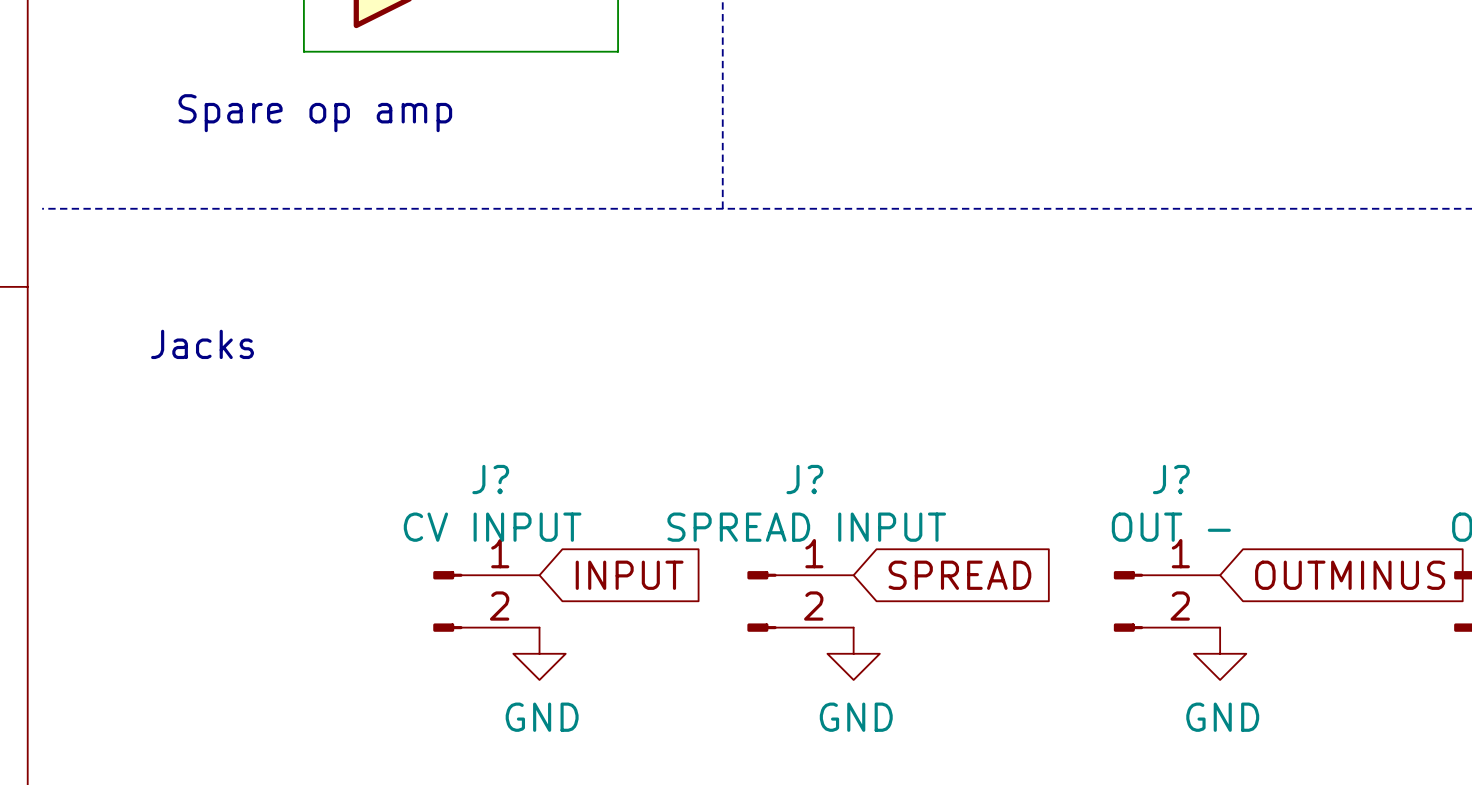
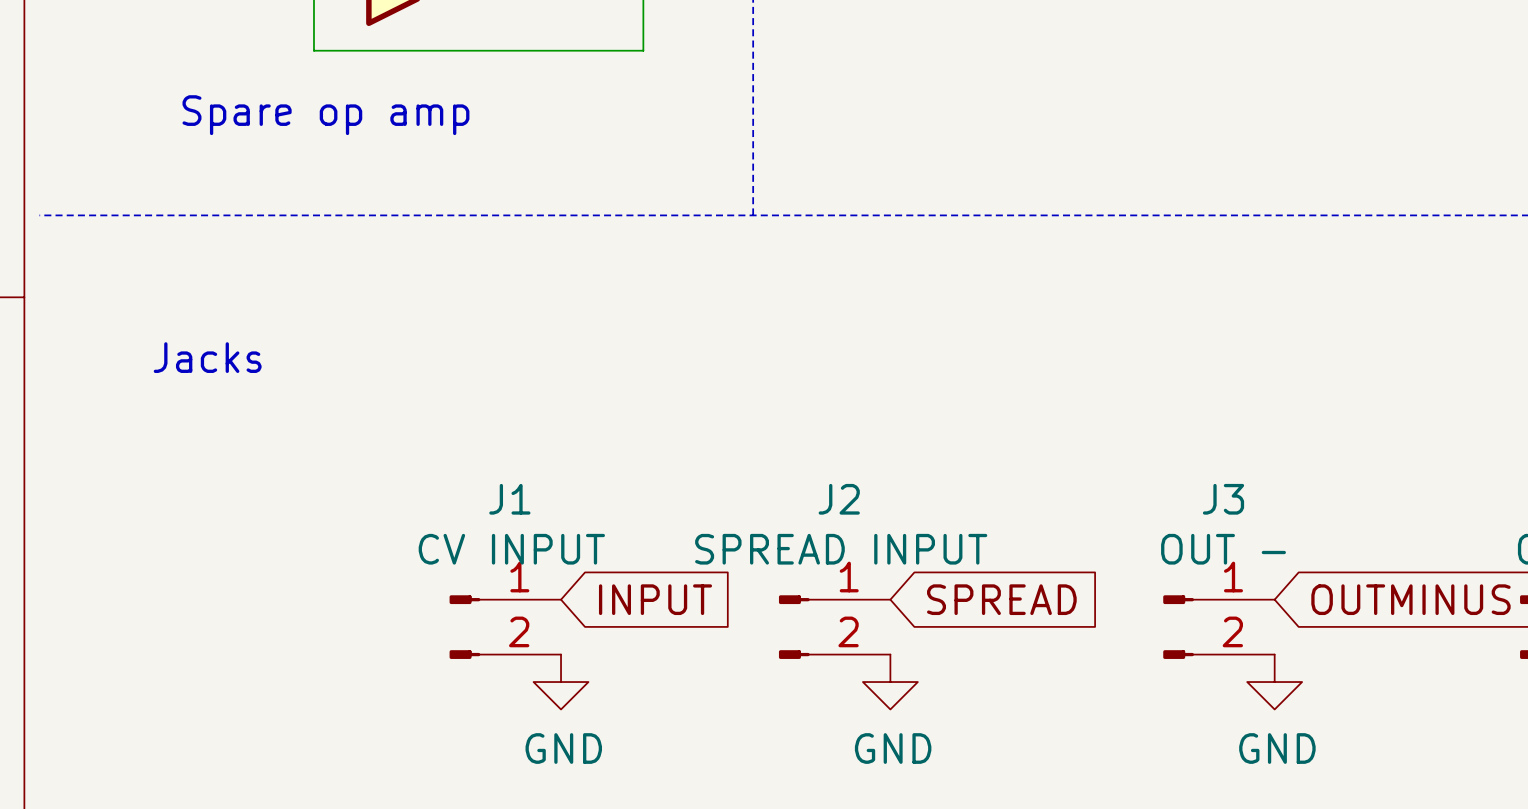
J? name: J? (490, 479) -> J1 (509, 499)
J? name: J? (804, 479) -> J2 (839, 499)
J? name: J? (1171, 479) -> J3 (1223, 499)

